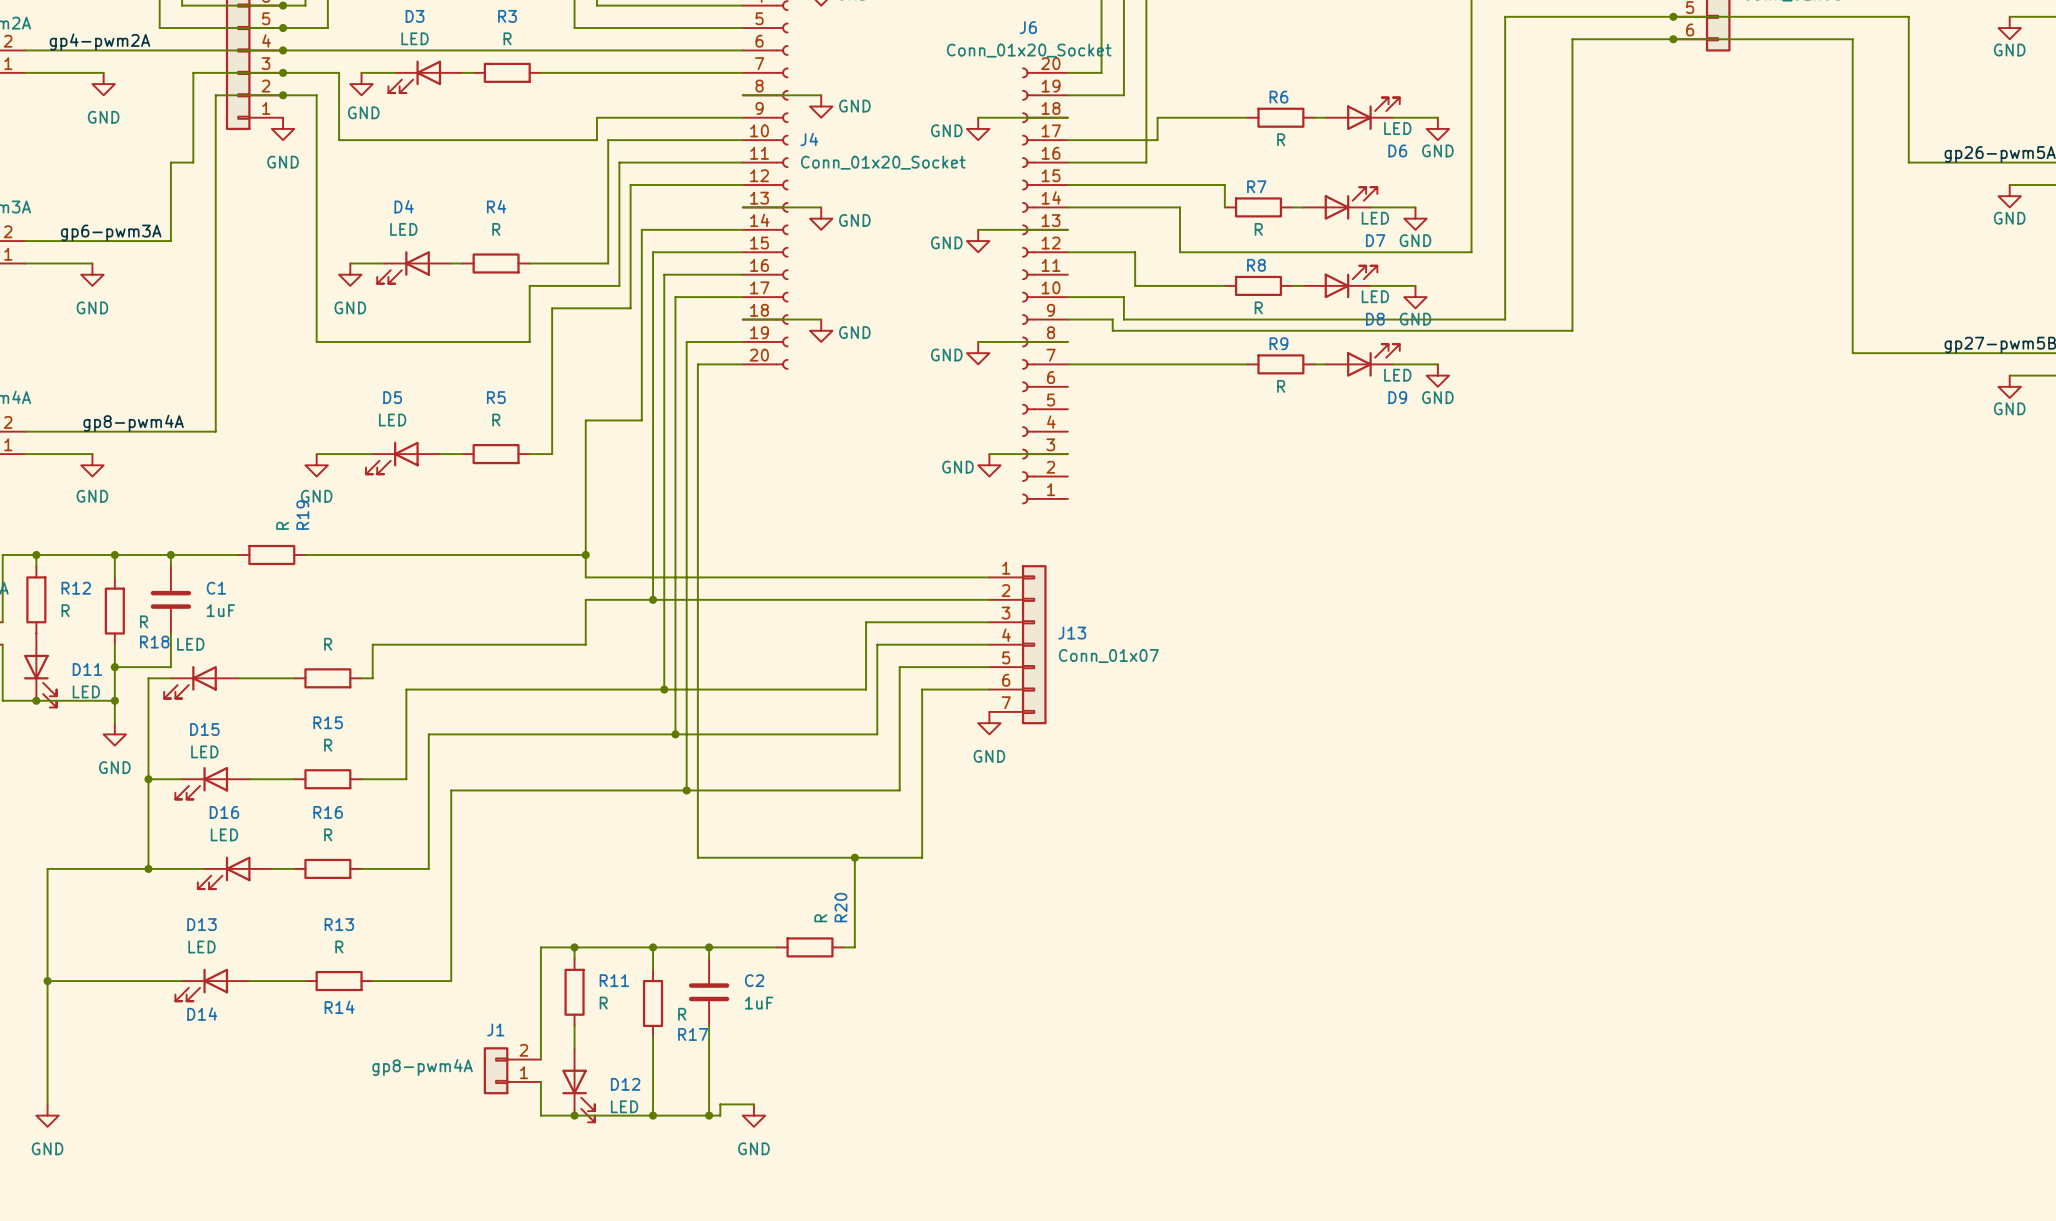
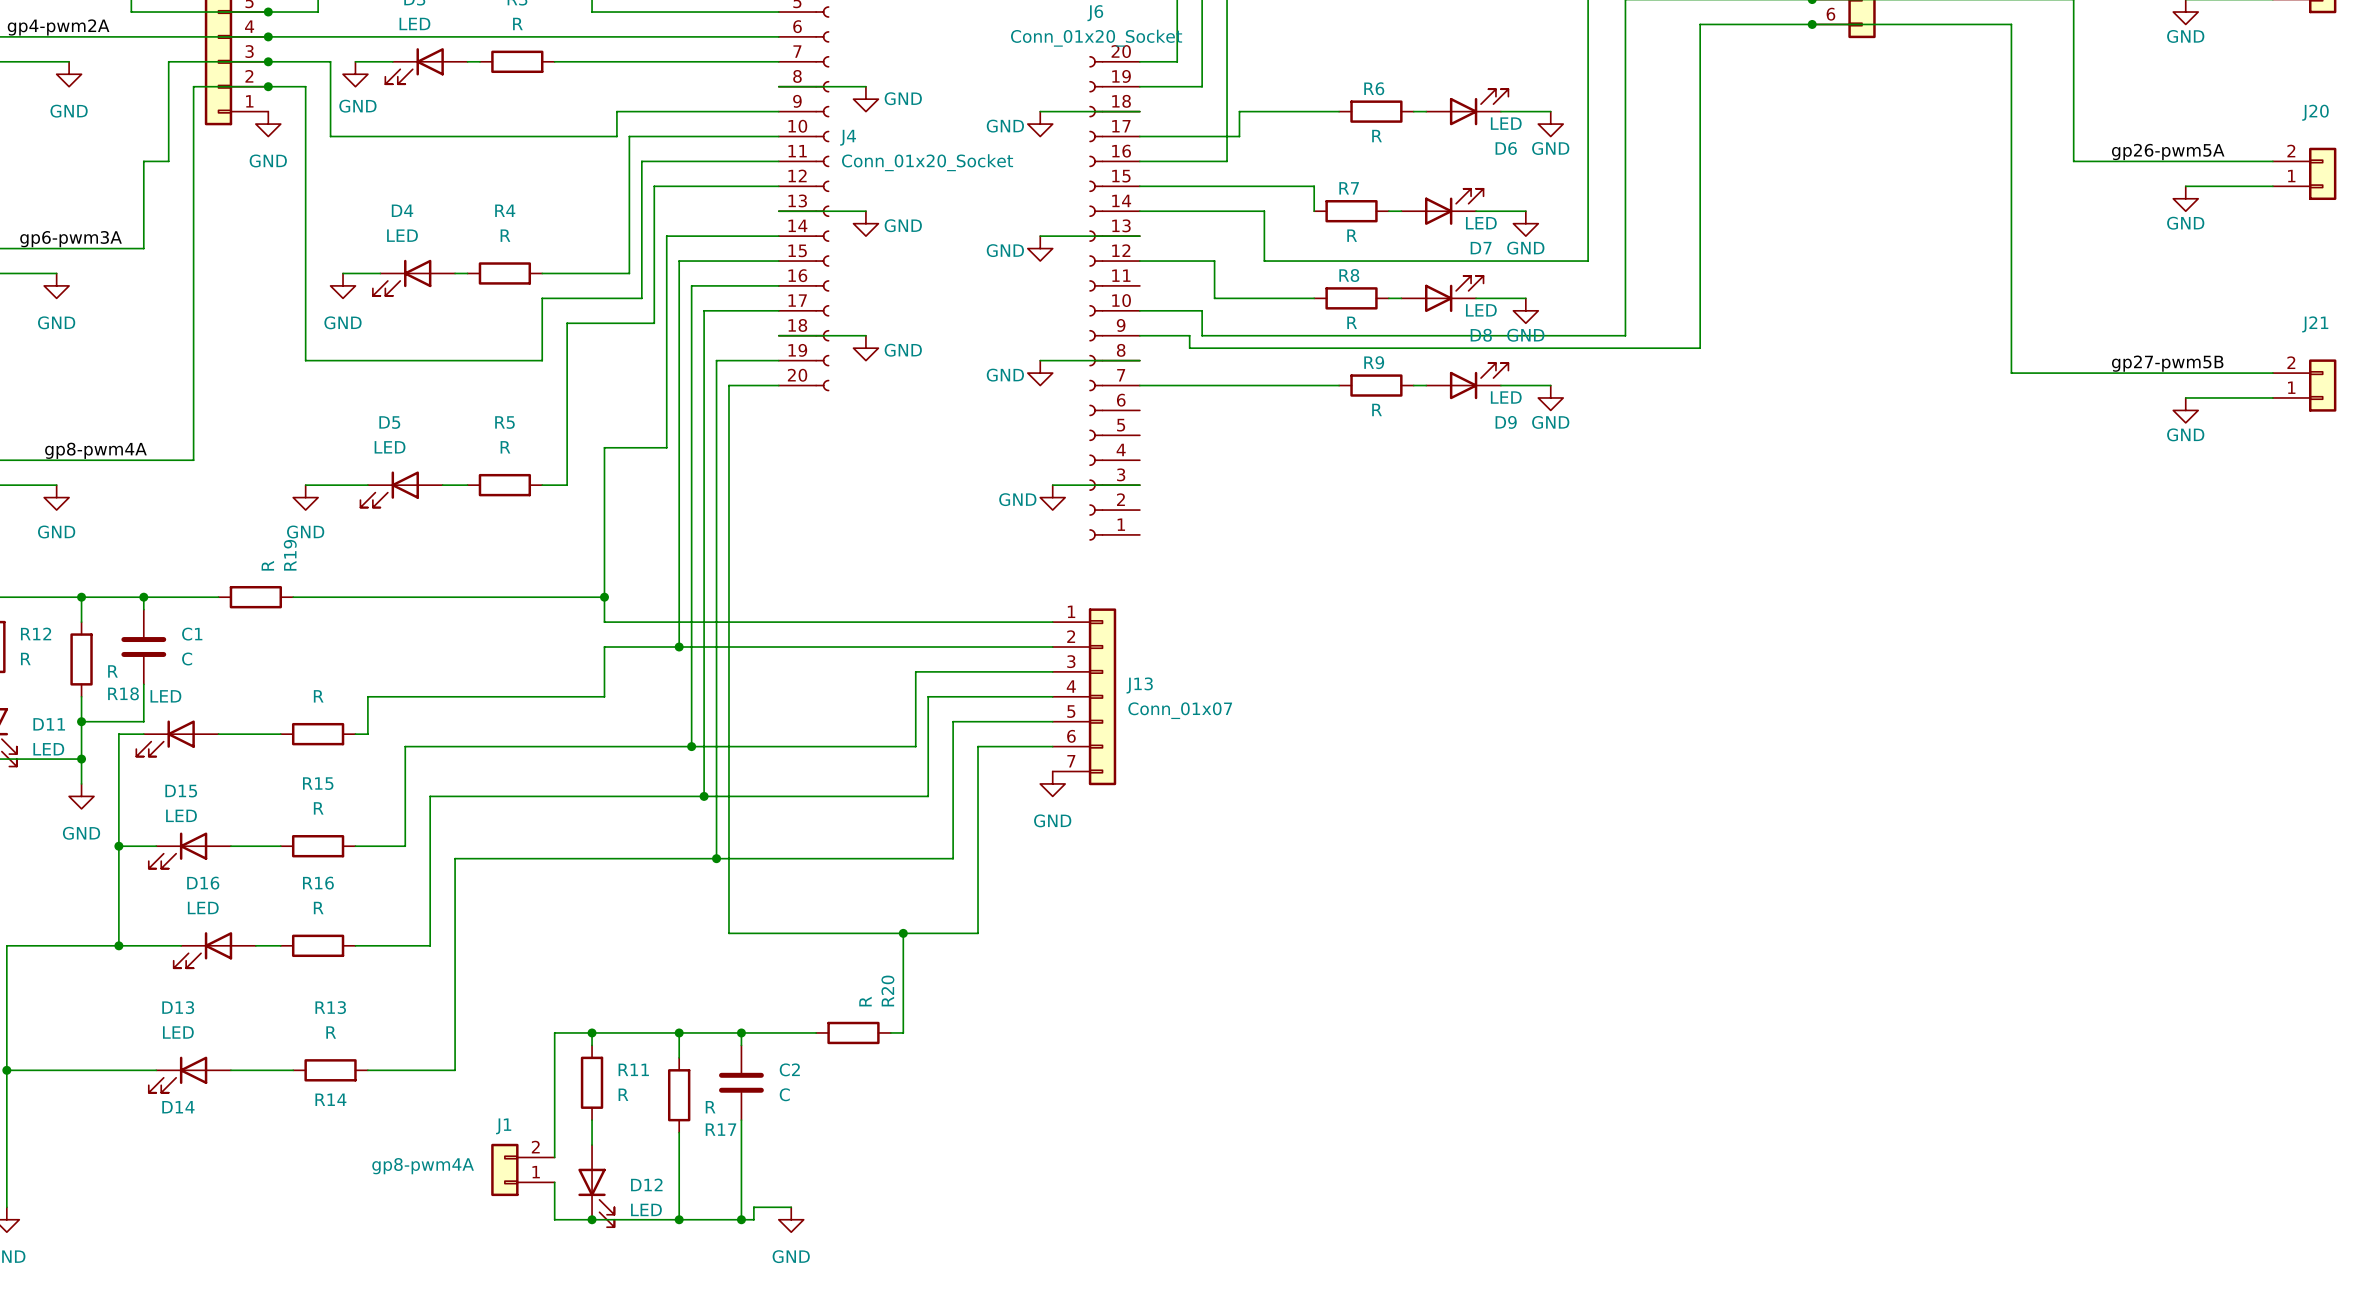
C1 value: 1uF (220, 610) -> C (187, 658)
C2 value: 1uF (759, 1003) -> C (784, 1094)

